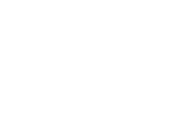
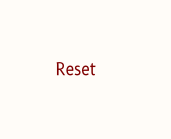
text: none -> Reset (76, 68)

